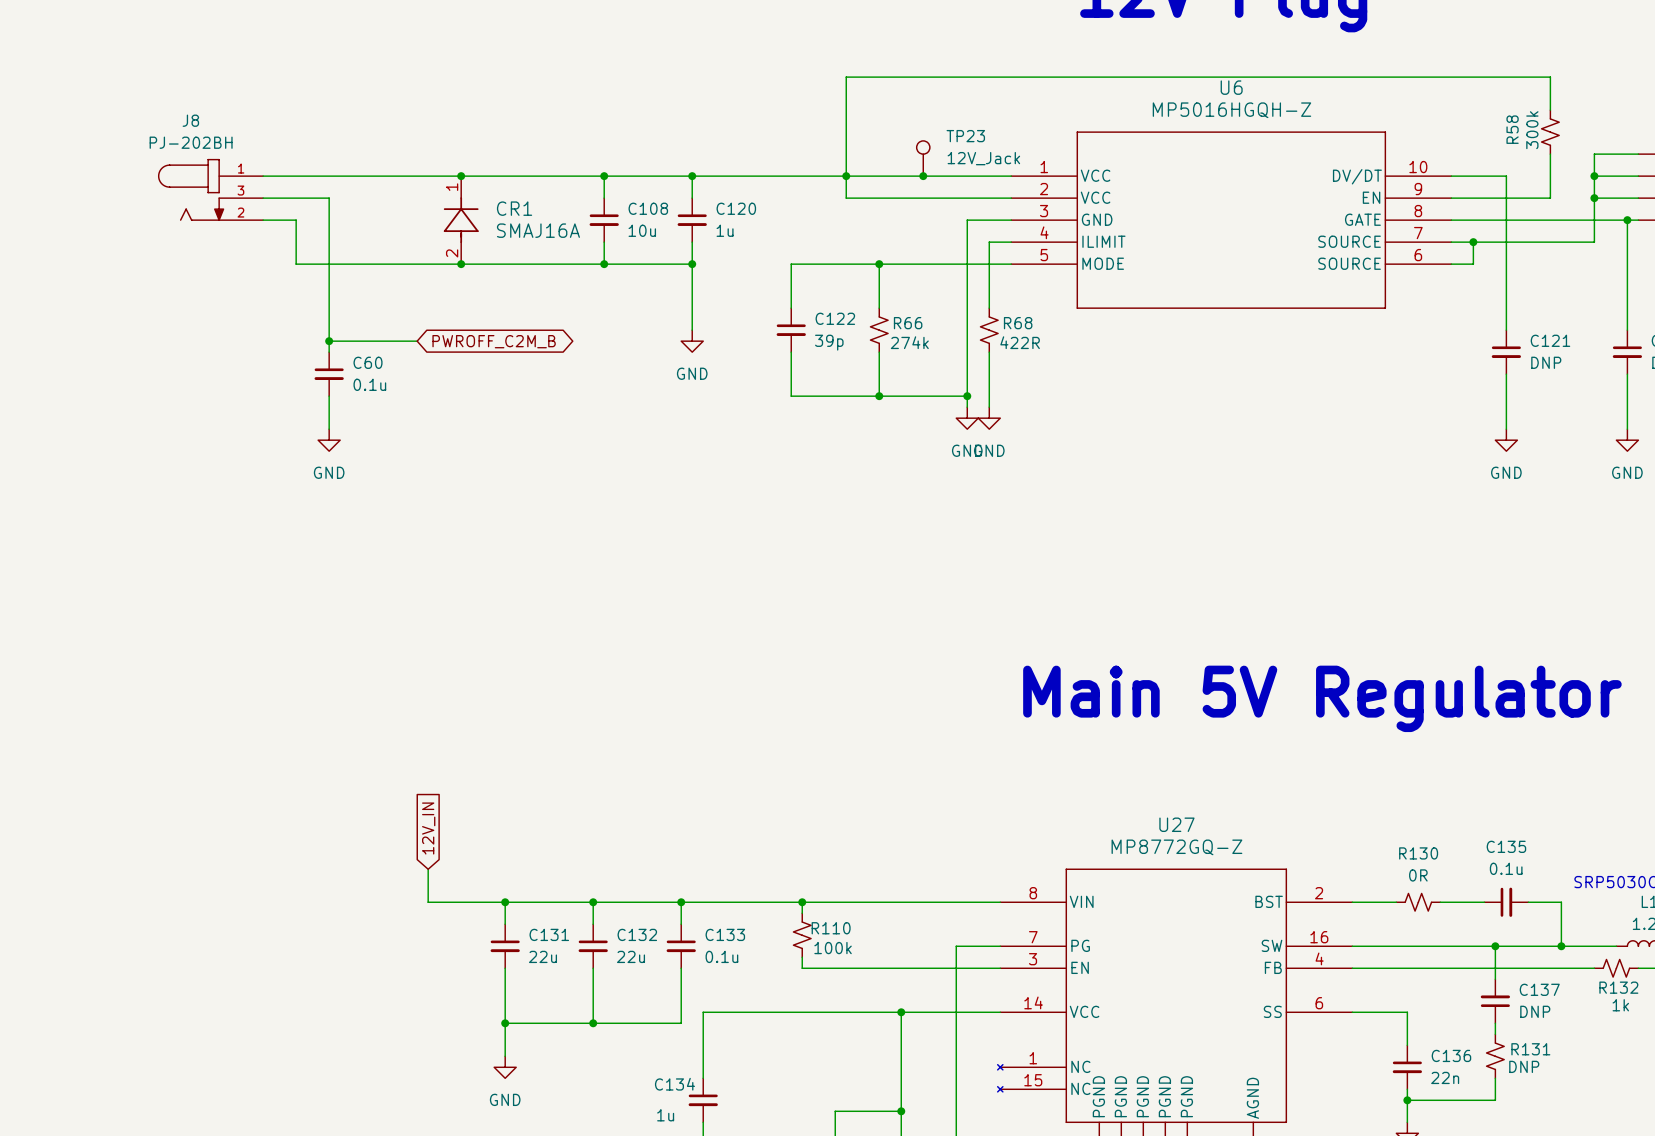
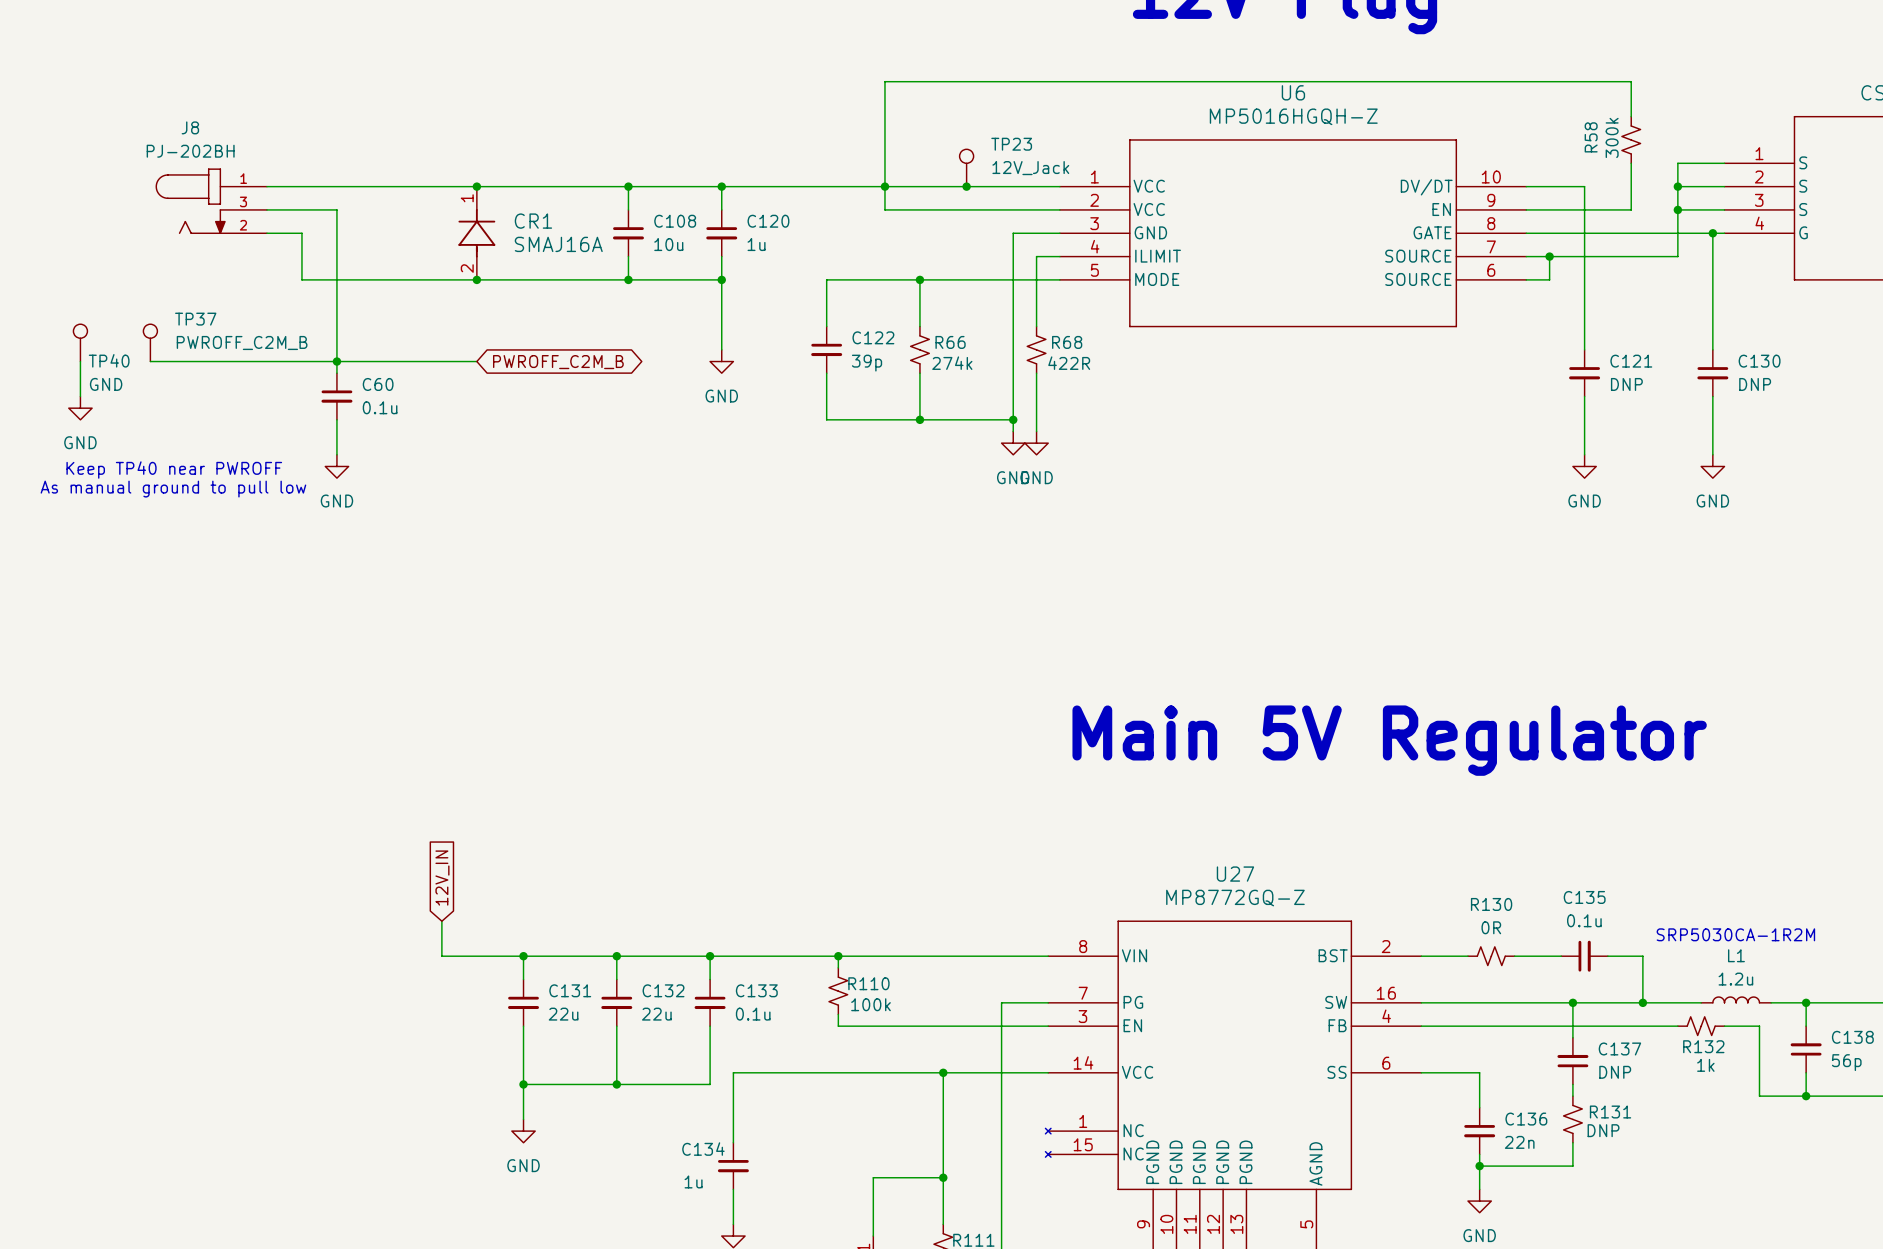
TP40: none -> GND (80, 342)
TP37: none -> PWROFF_C2M_B (150, 342)
wire: none -> (80, 361) (80, 396)
wire: none -> (150, 361) (336, 361)
wire: none -> (430, 361) (476, 361)
global label position: PWROFF_C2M_B (494, 341) -> PWROFF_C2M_B (558, 362)
power symbol: none -> GND (80, 408)
text: none -> Keep TP40 near PWROFF (174, 470)
text: none -> As manual ground to pull low (173, 489)

